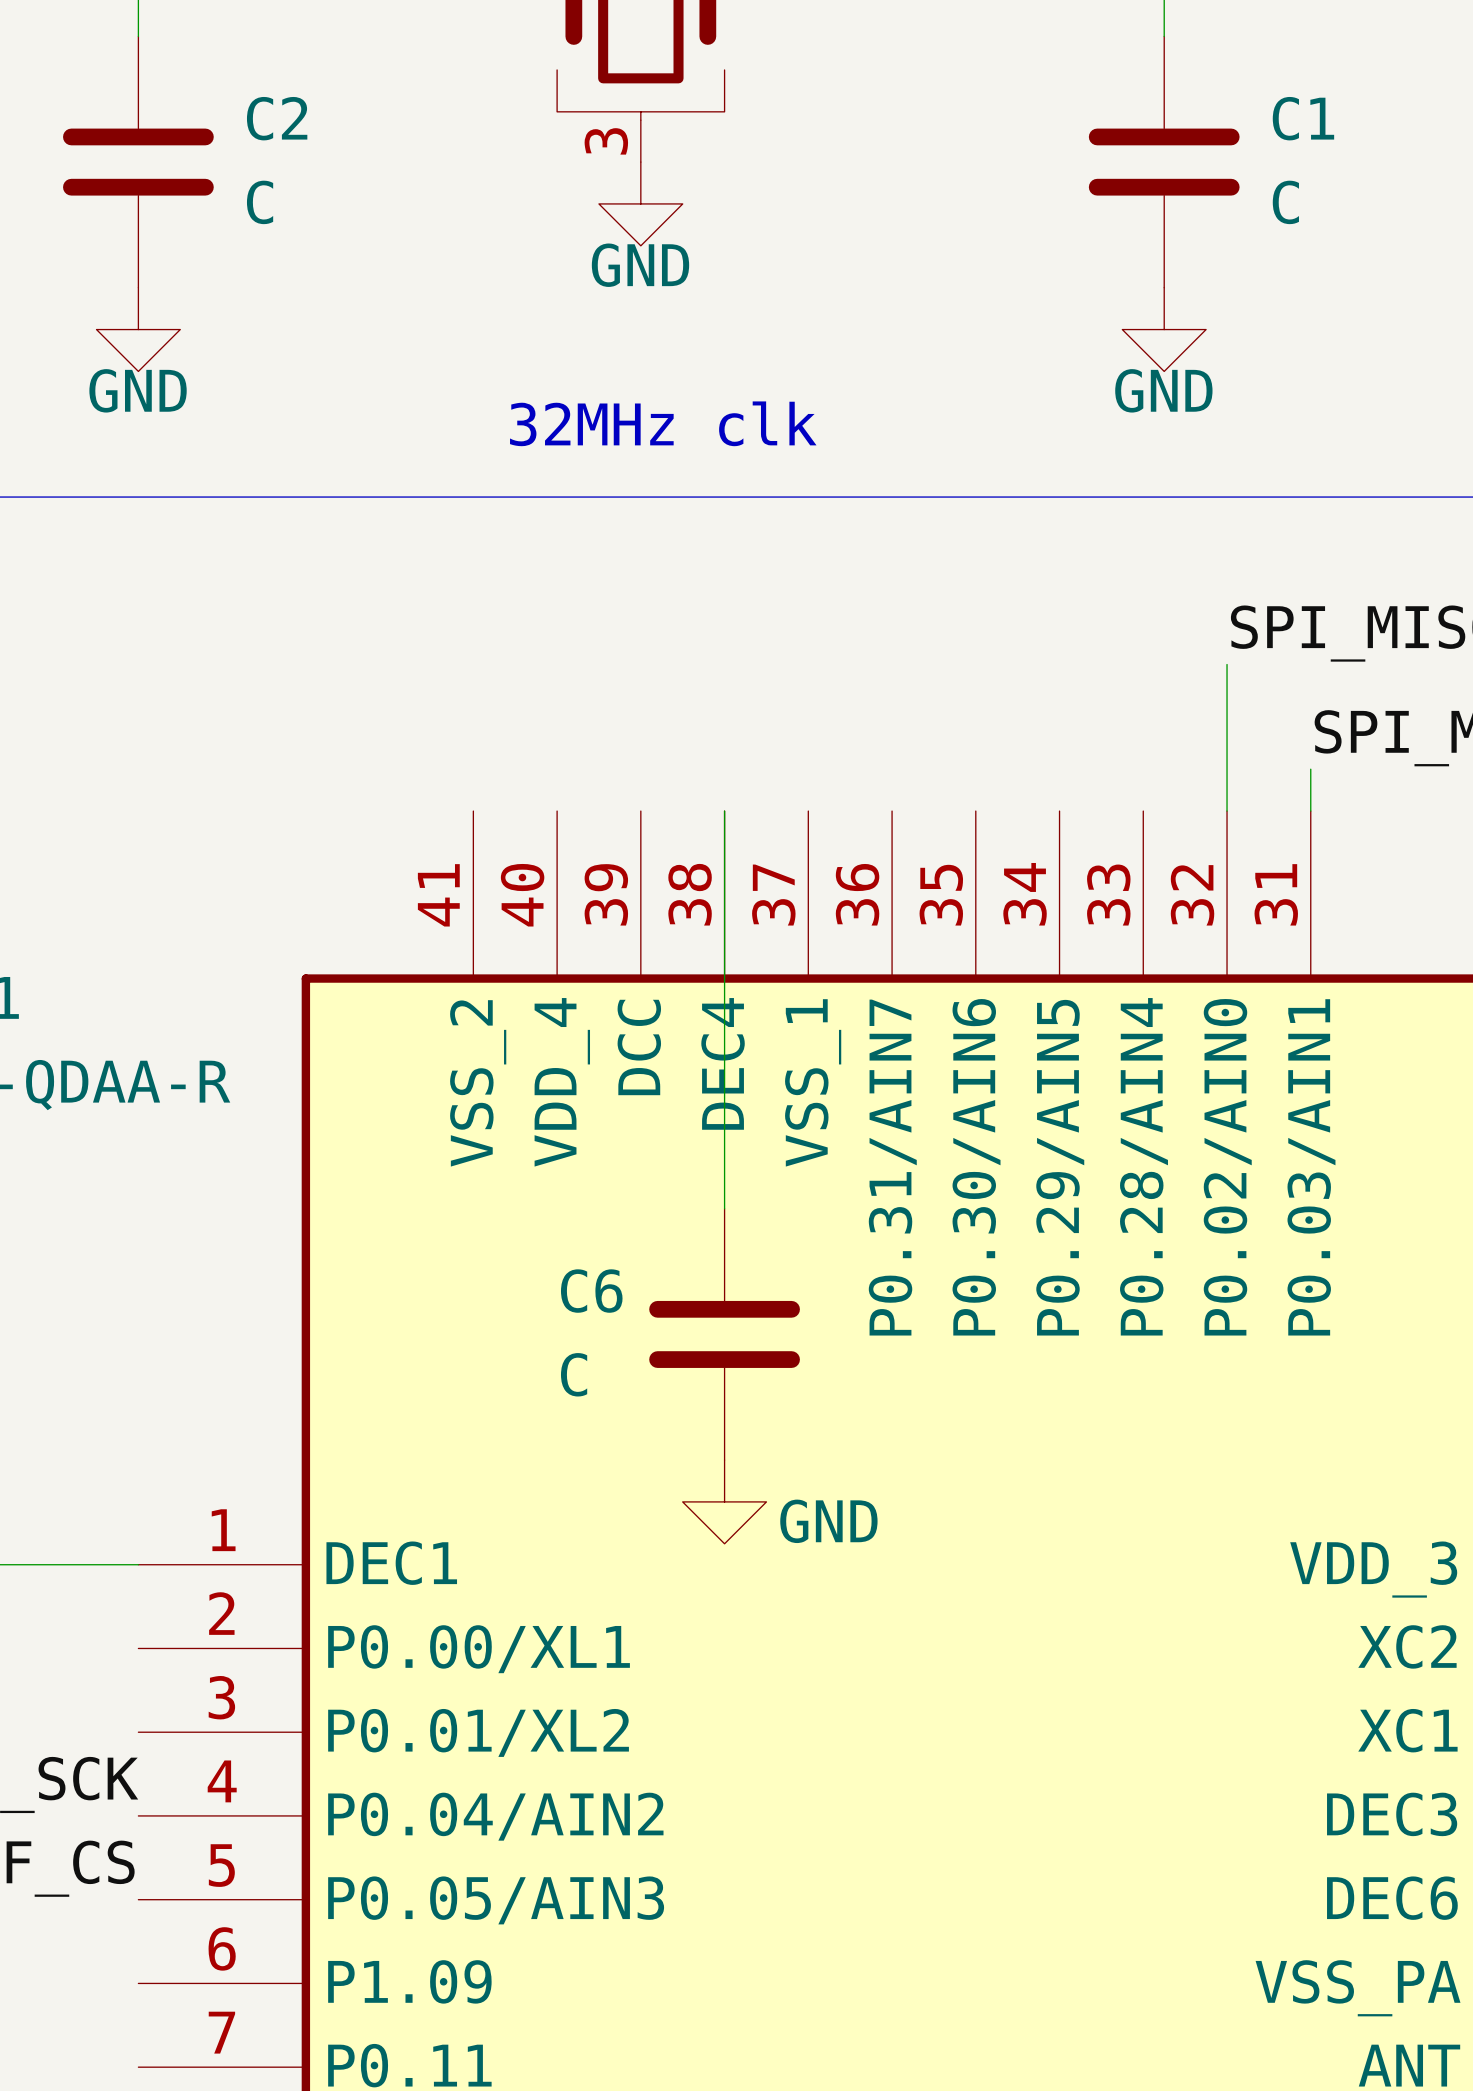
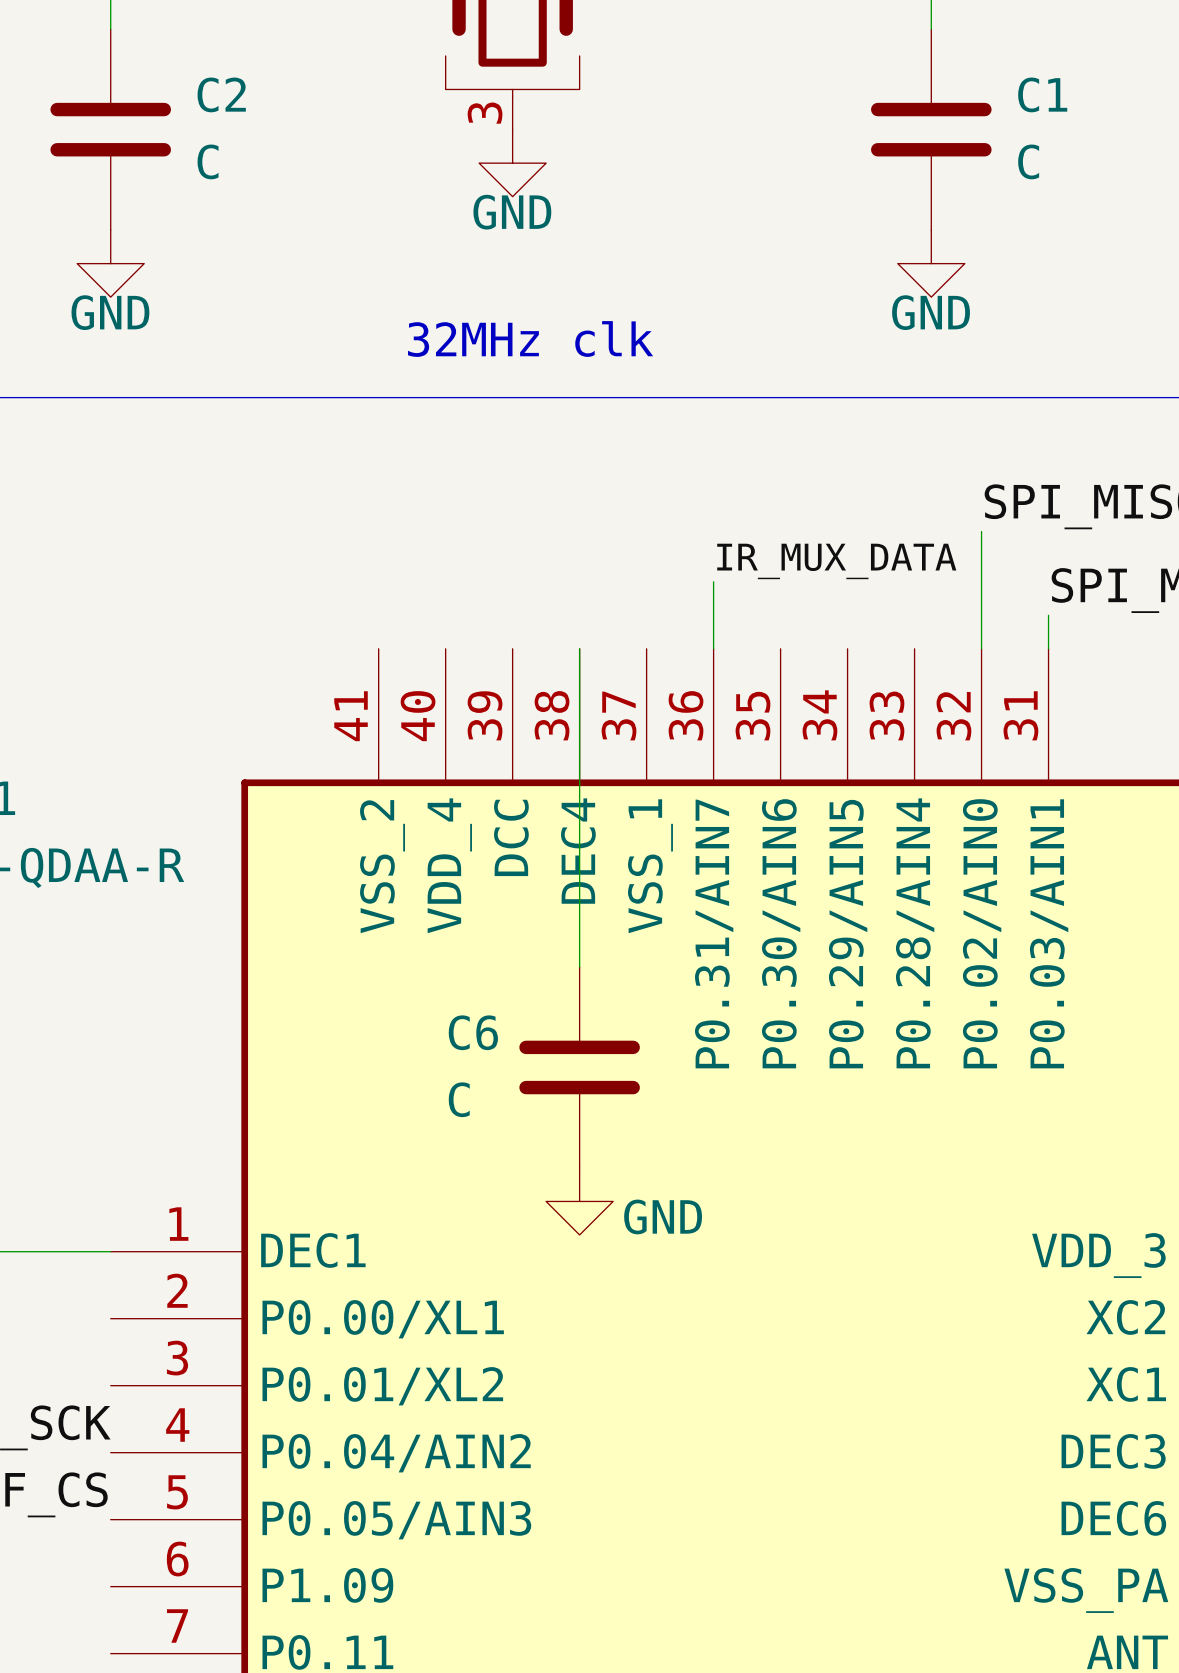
label: none -> IR_MUX_DATA (836, 561)
wire: none -> (713, 581) (713, 648)

